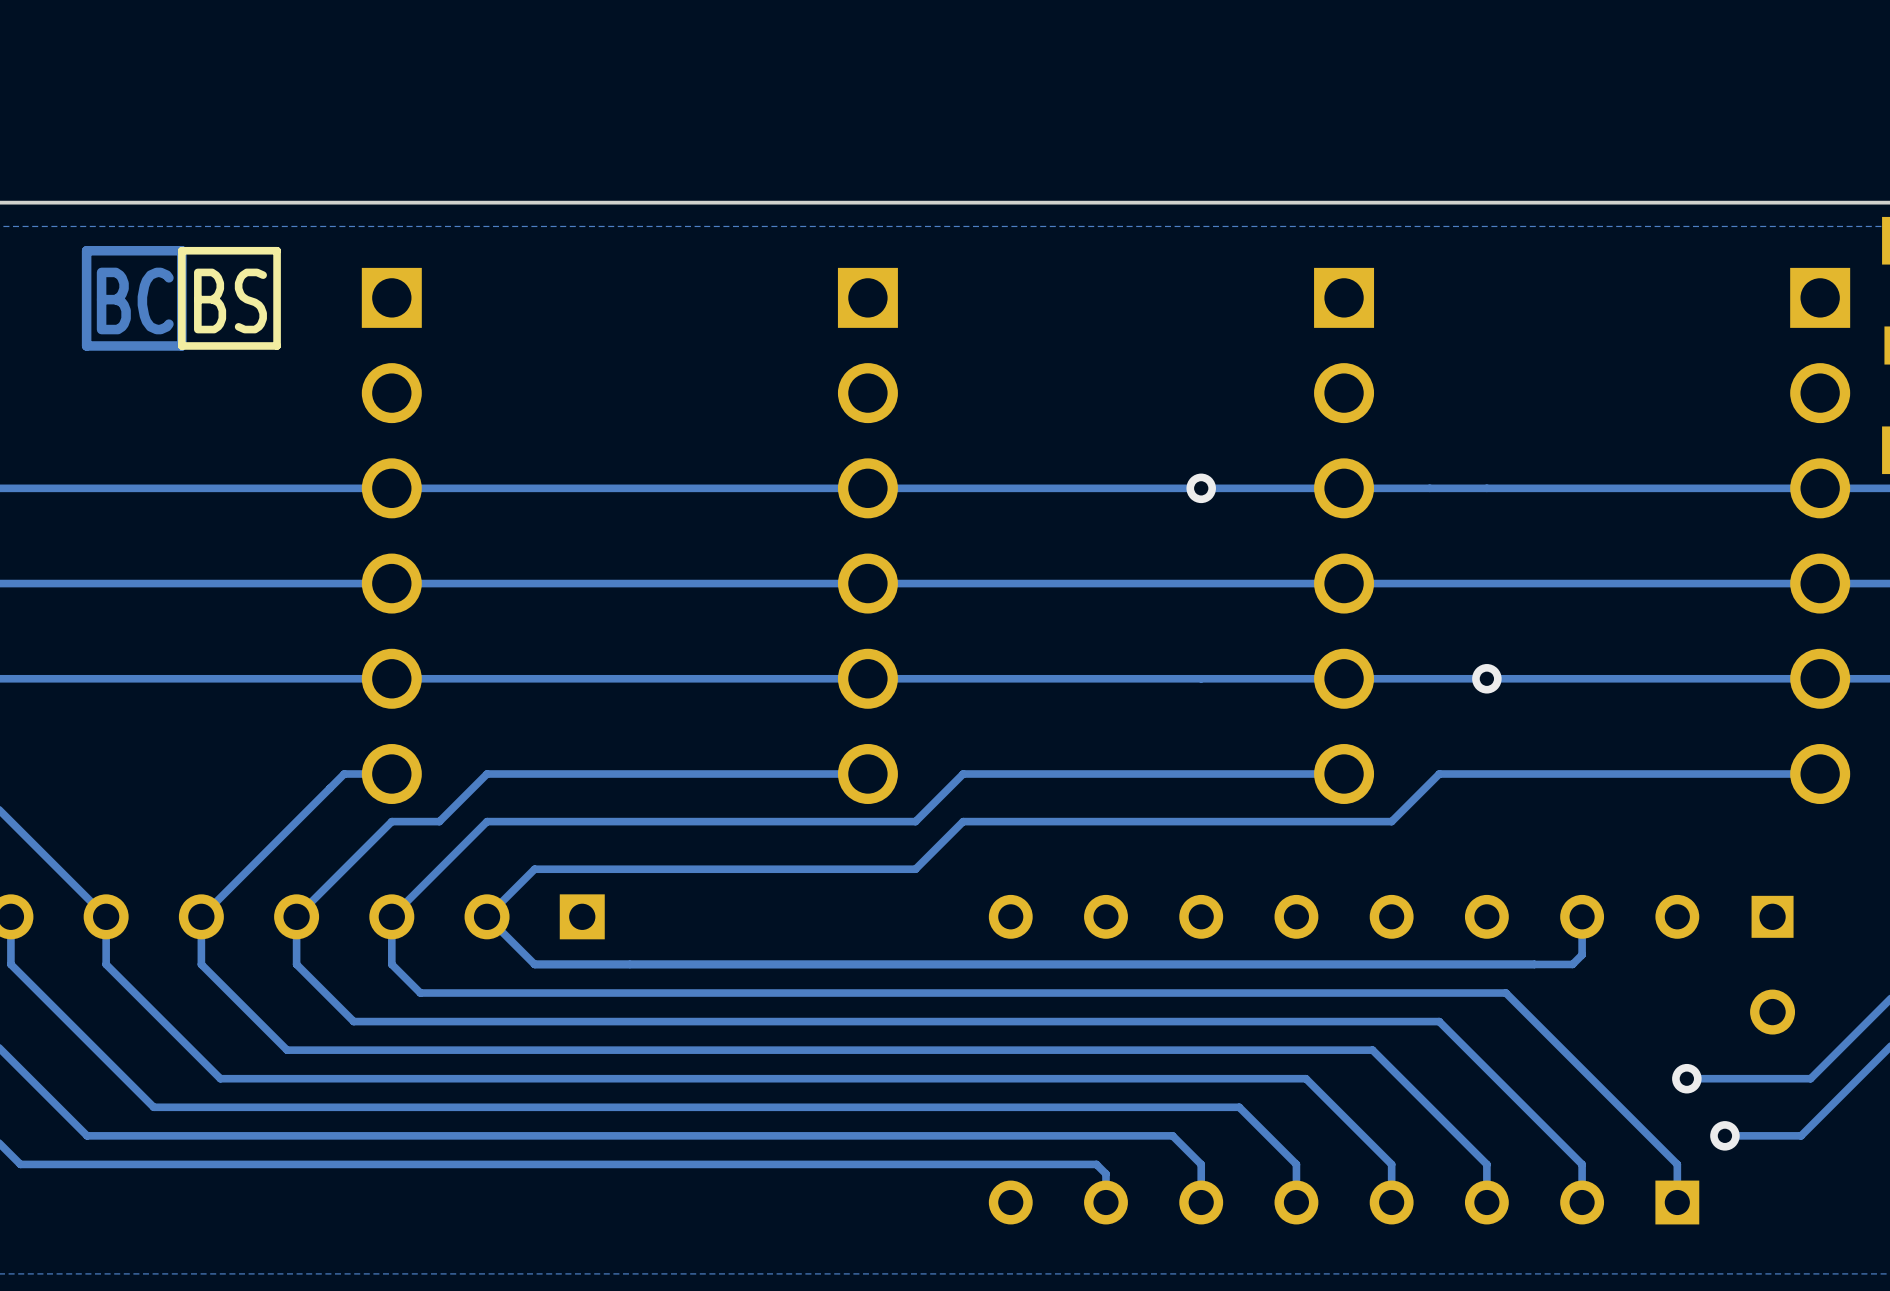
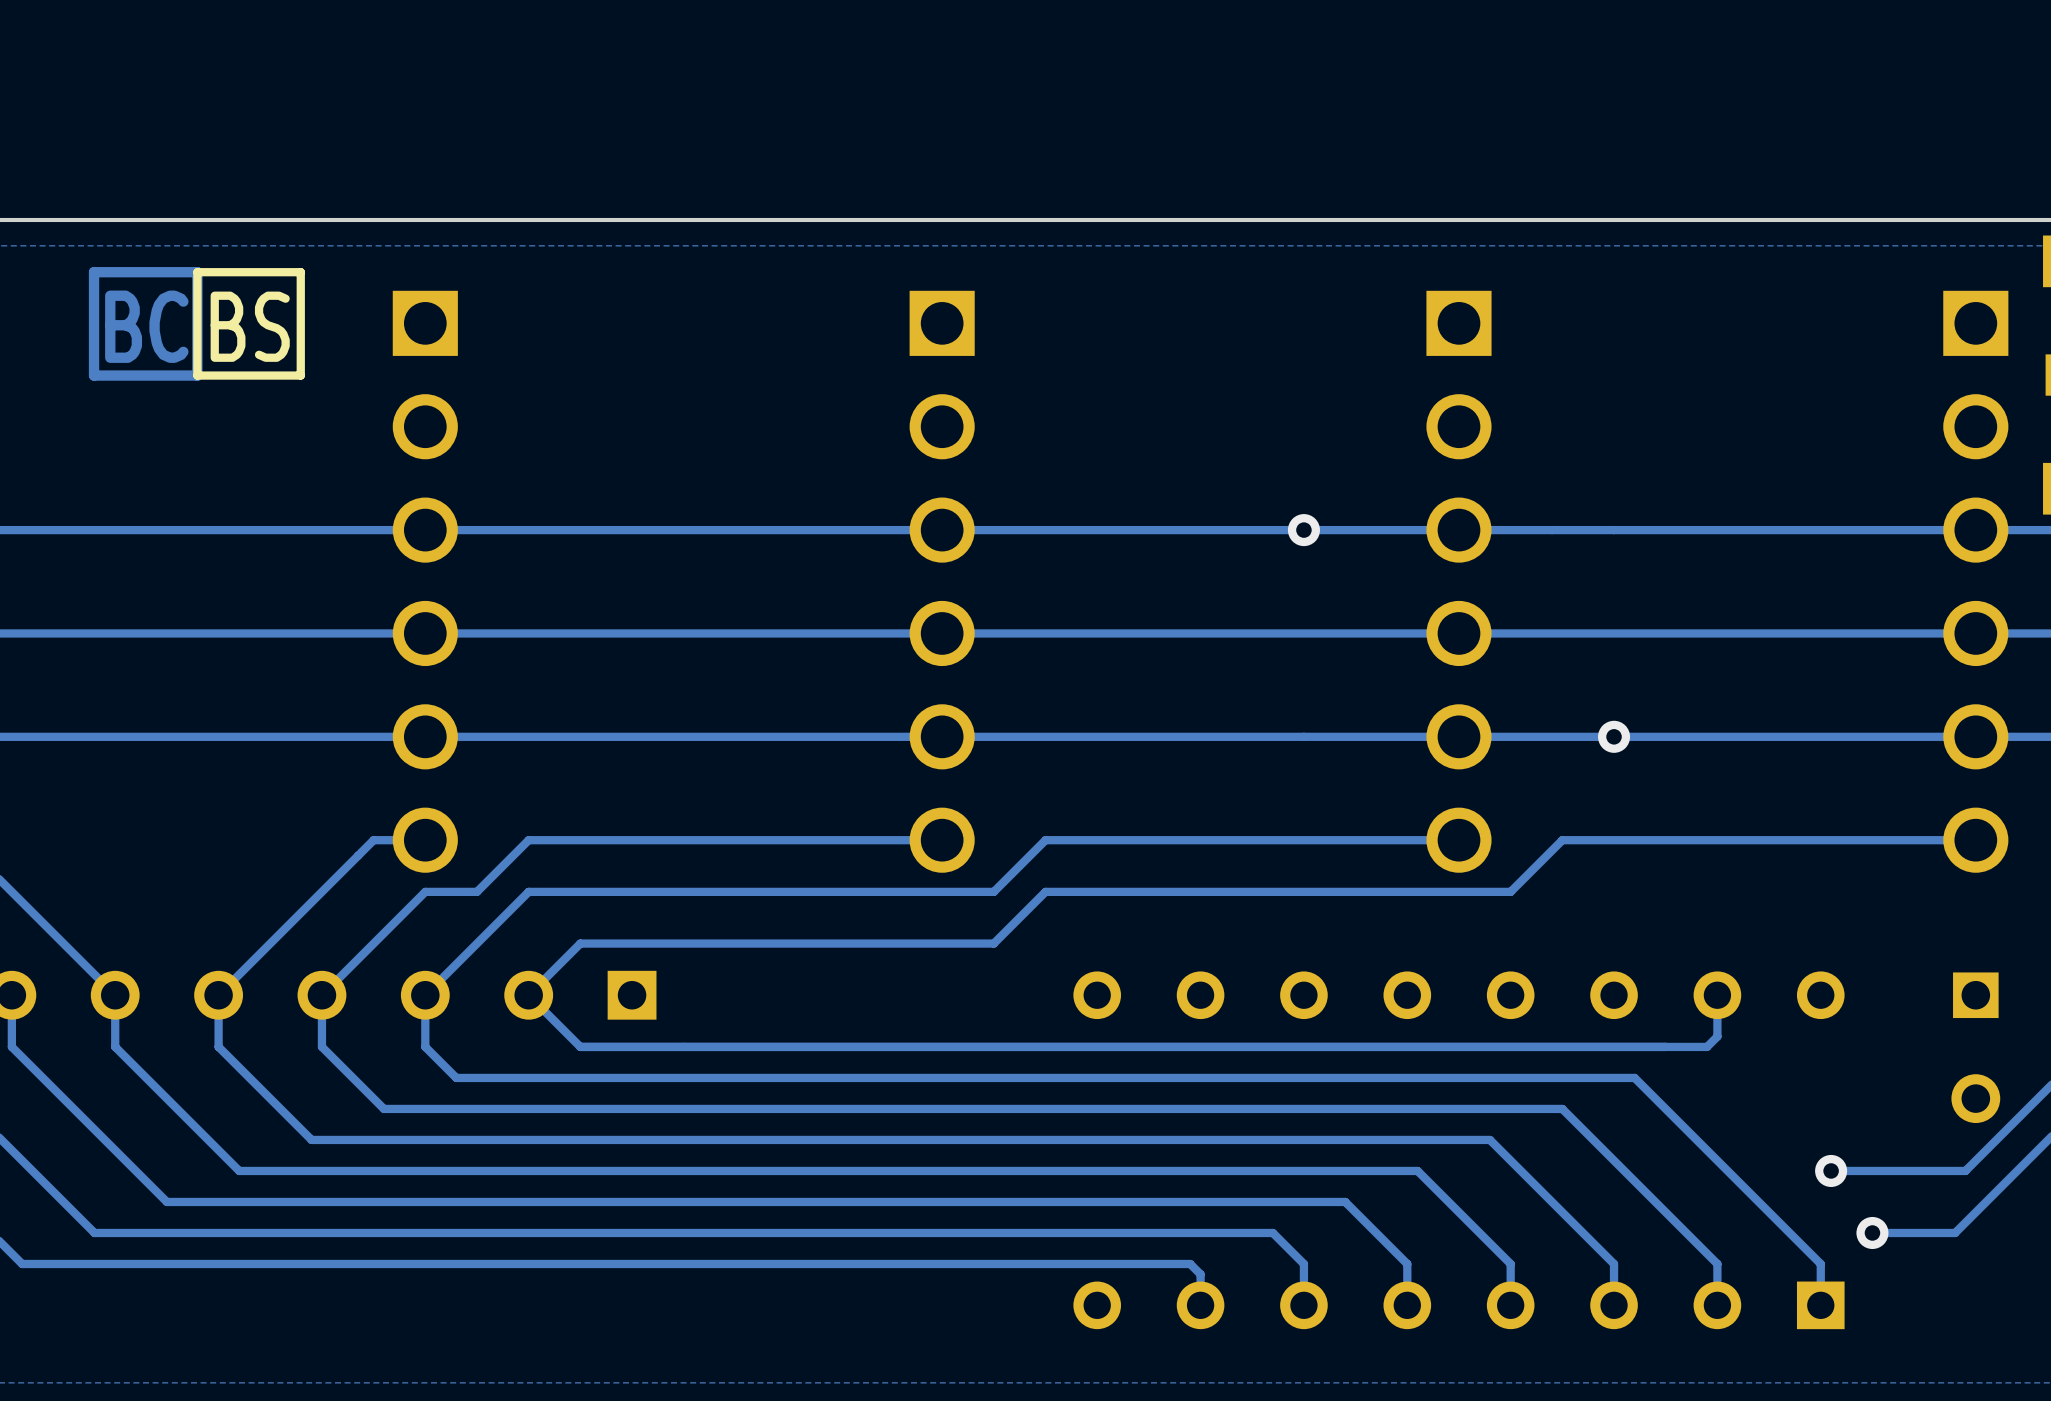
part position: (1772, 965) -> (1975, 1047)

